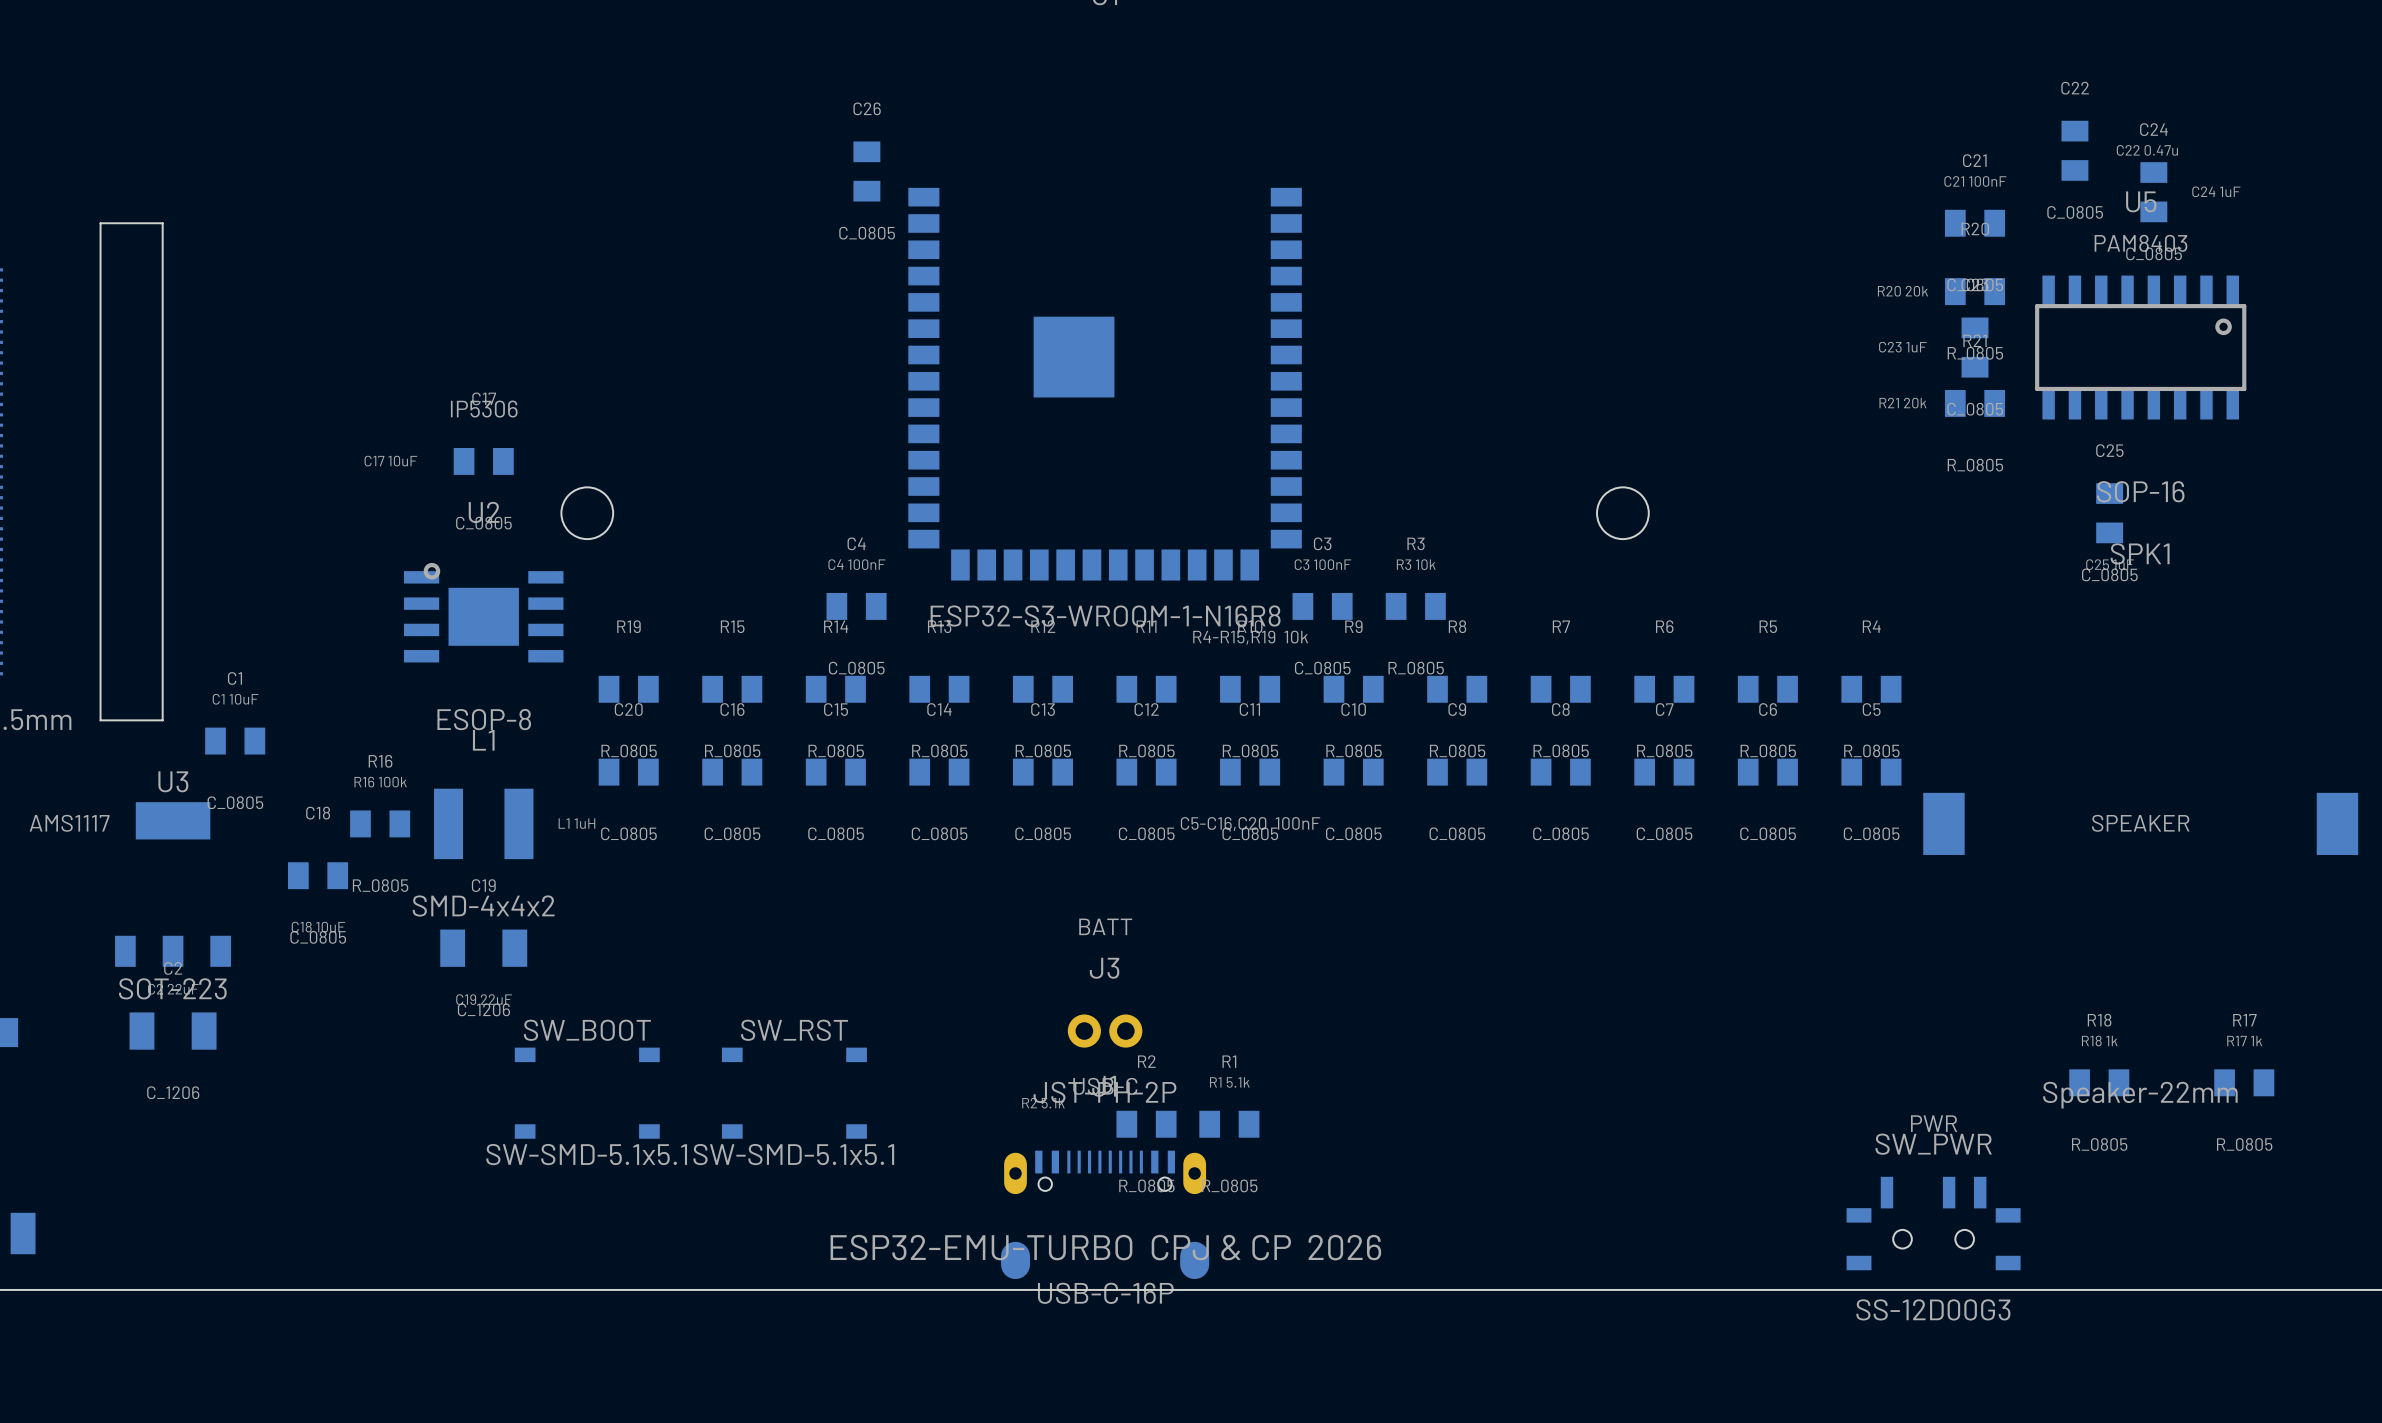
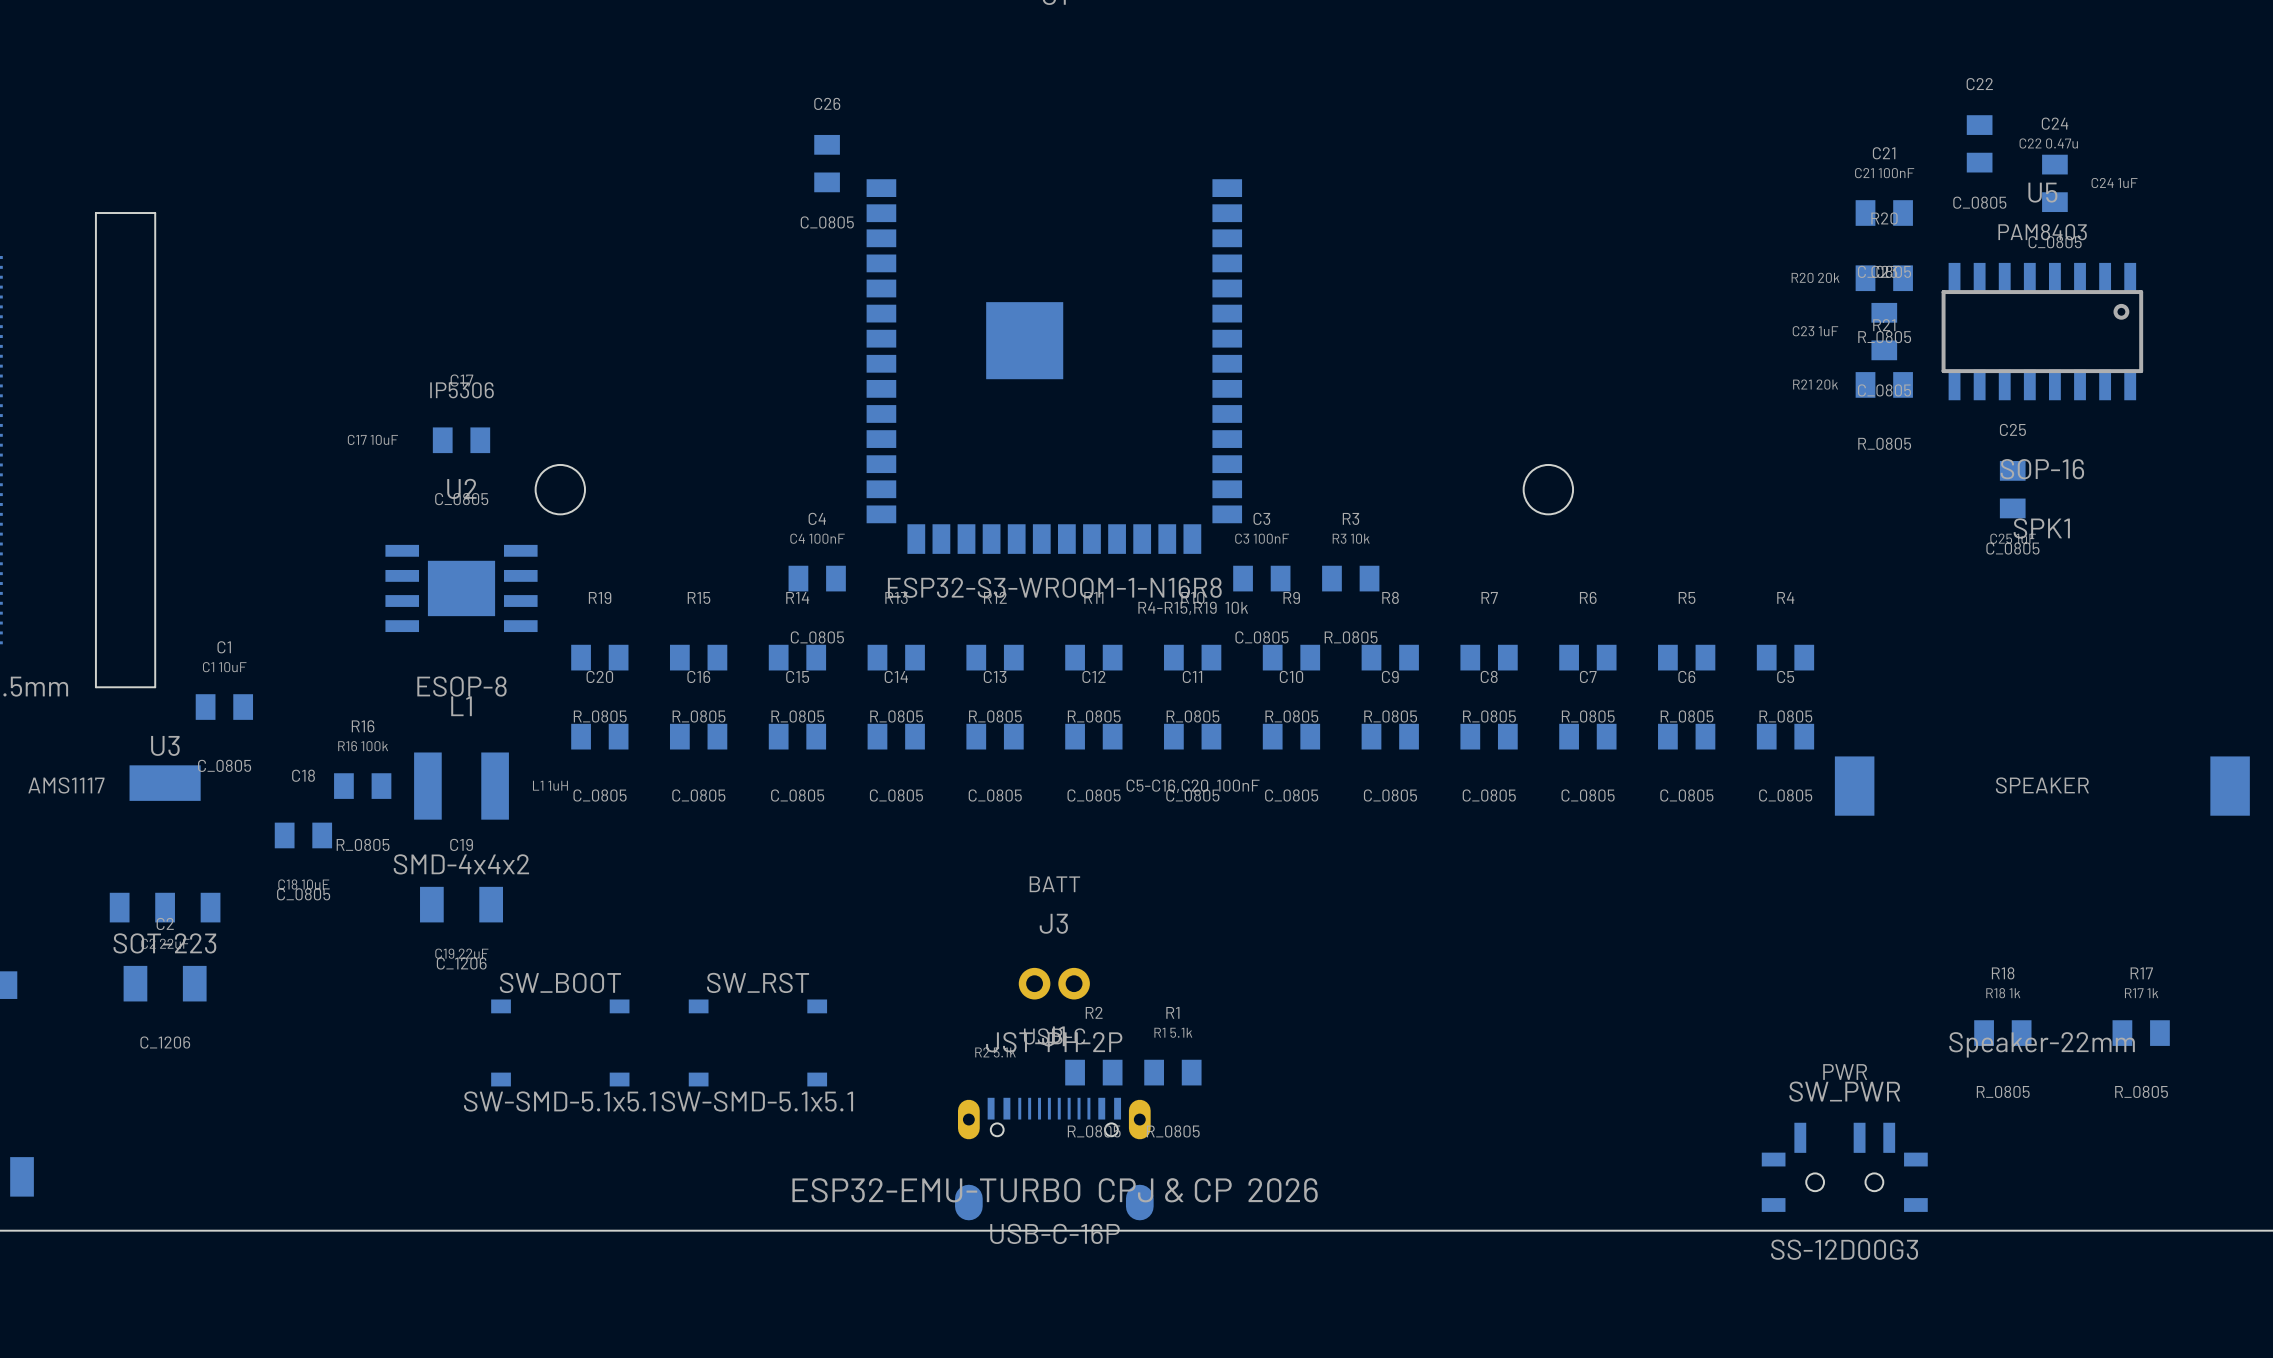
U2 footprint: [403, 562, 564, 663] -> [385, 544, 538, 633]

